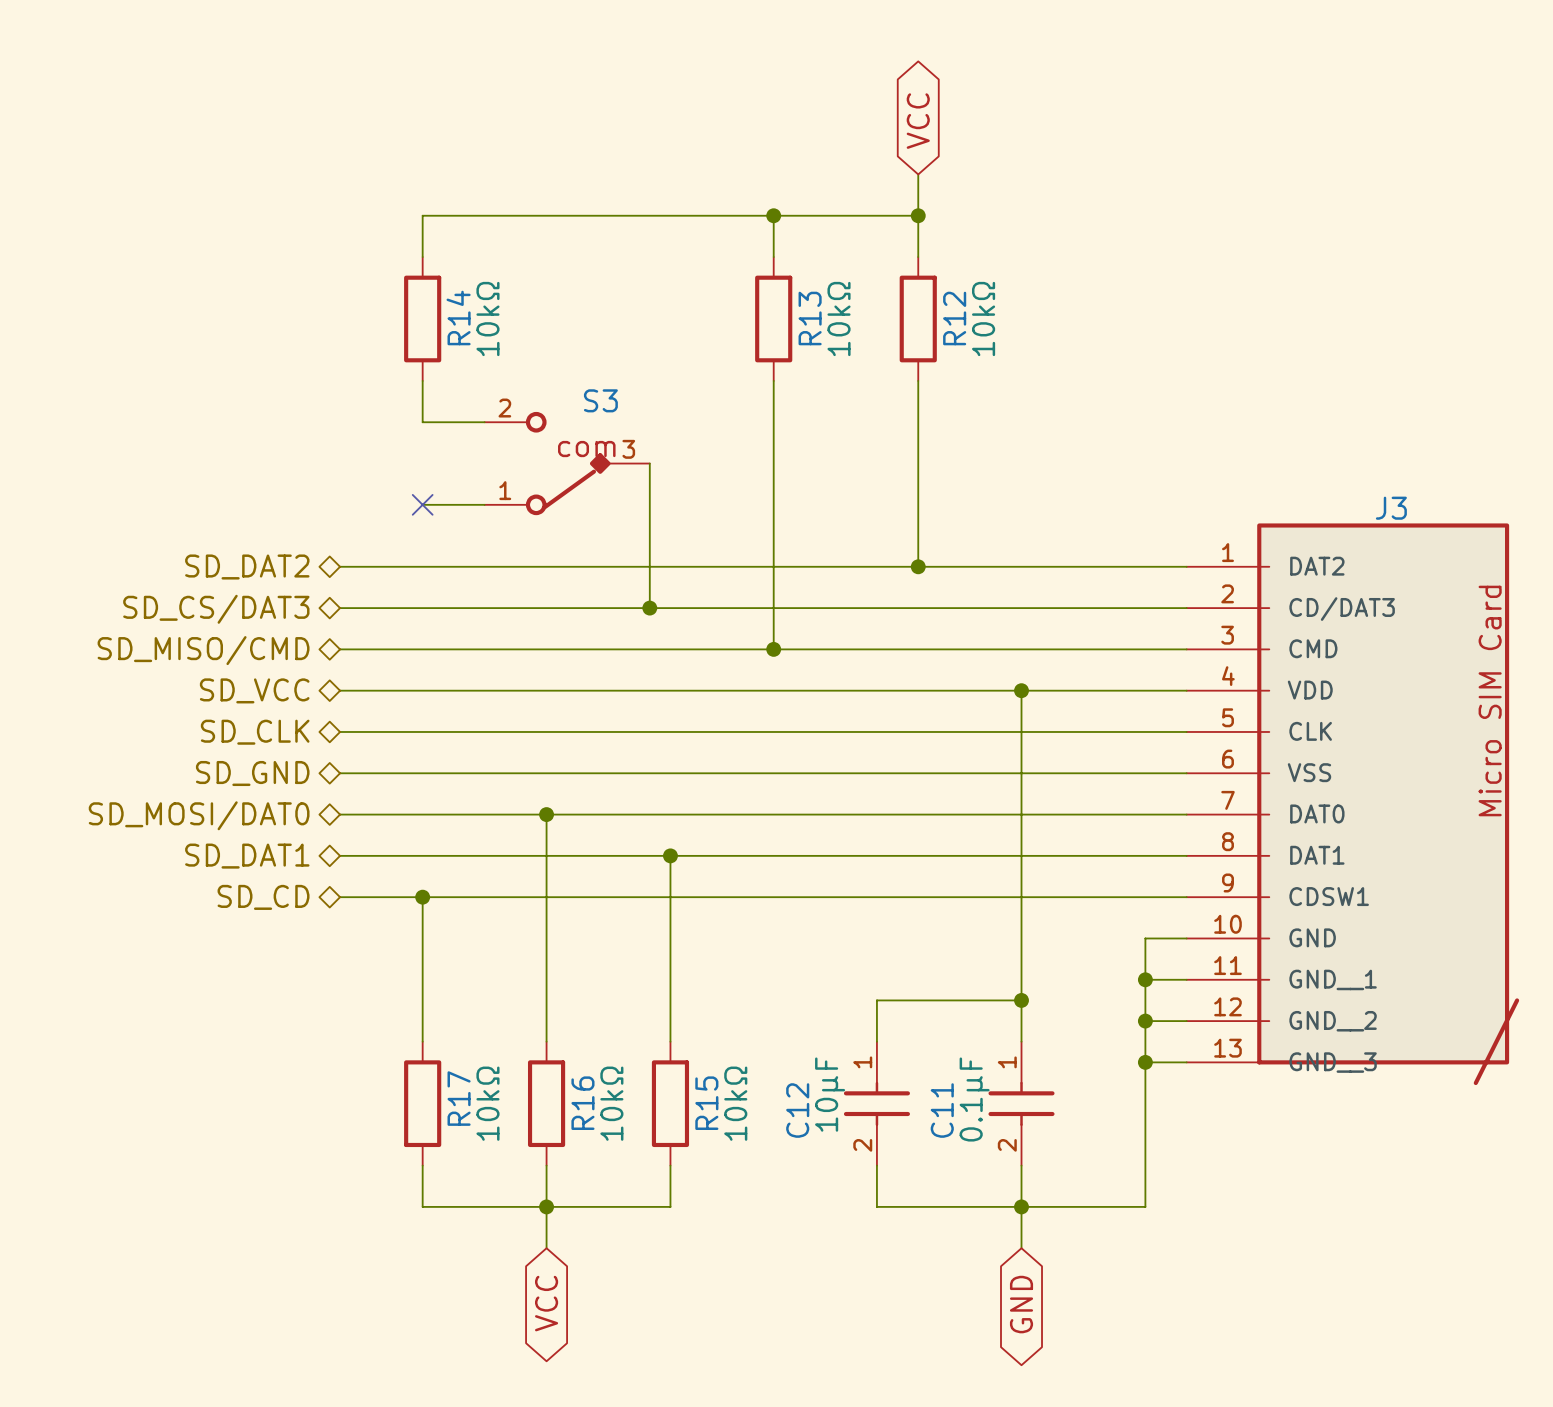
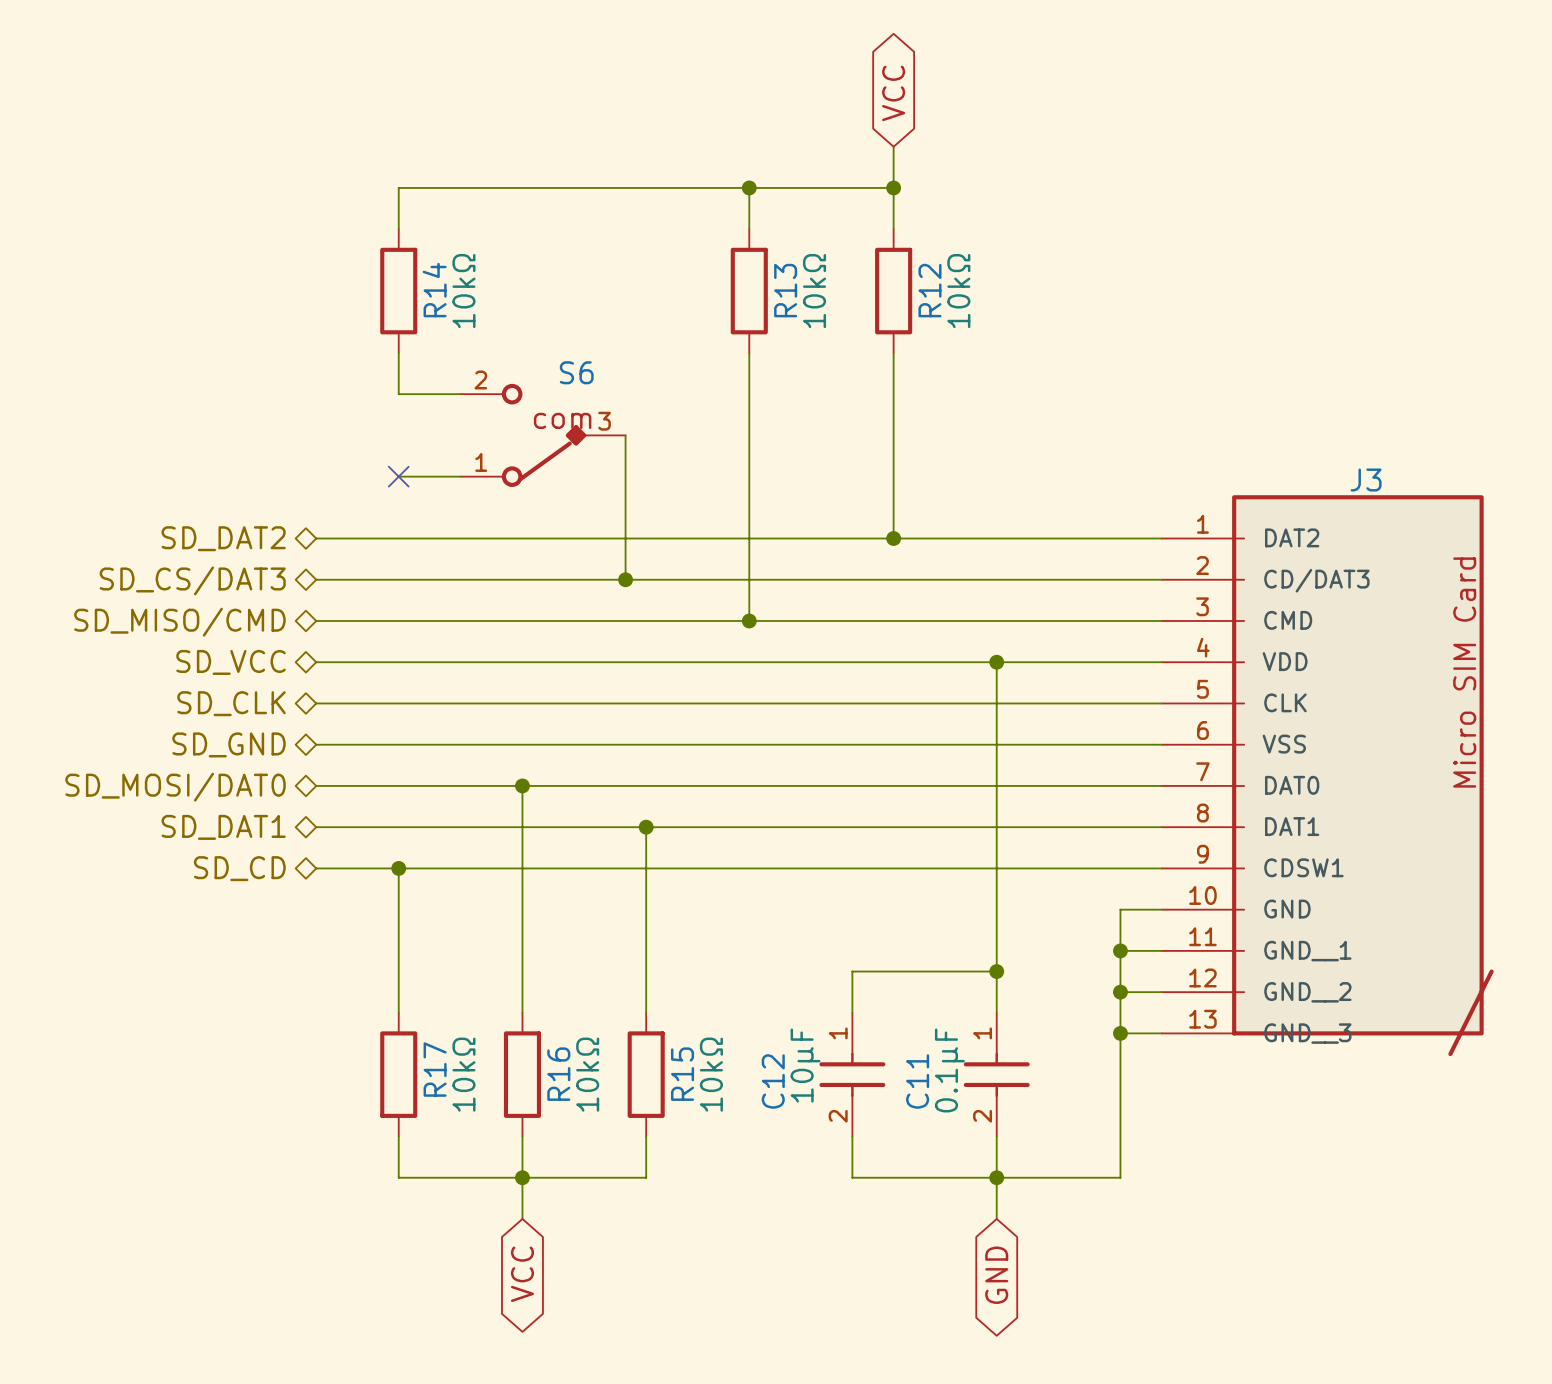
S3 name: S3 (600, 400) -> S6 (576, 372)

